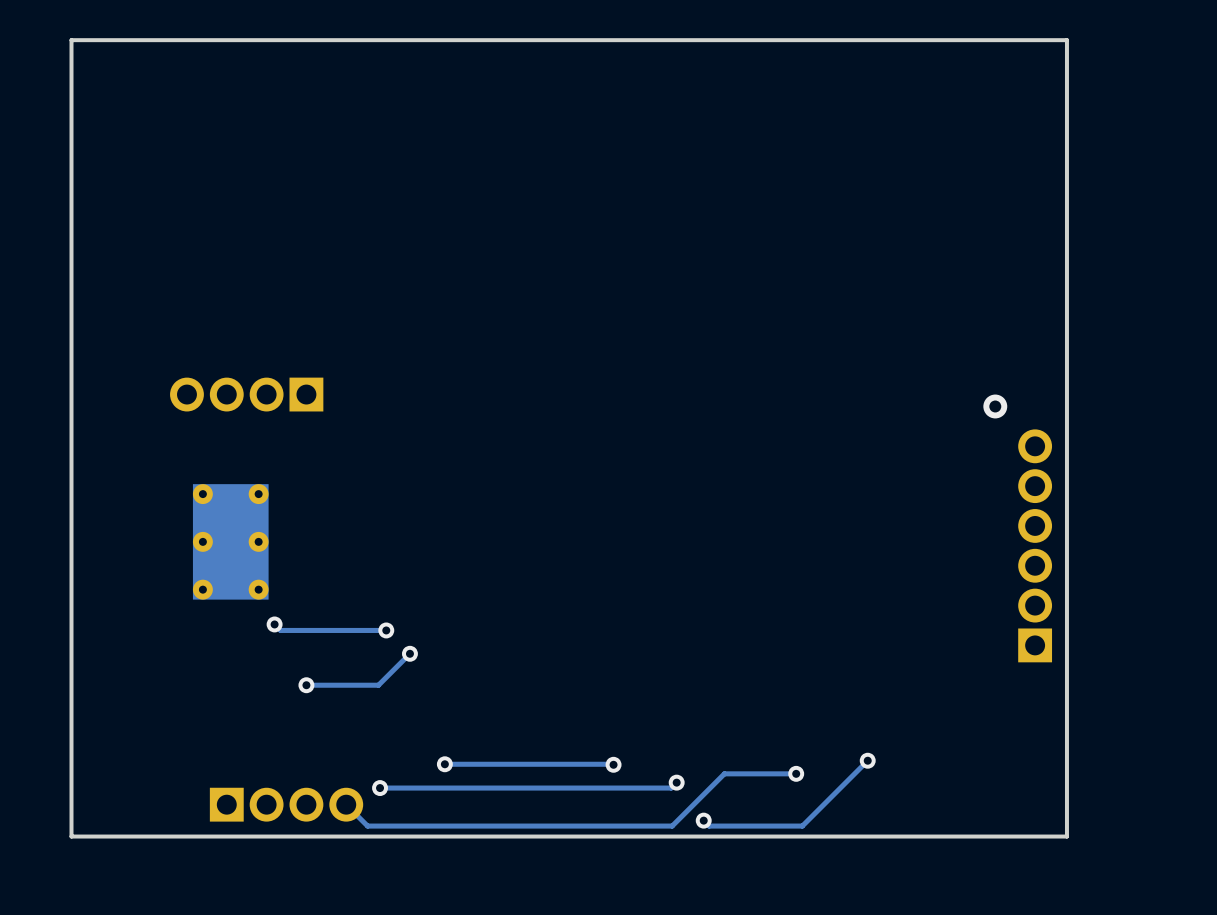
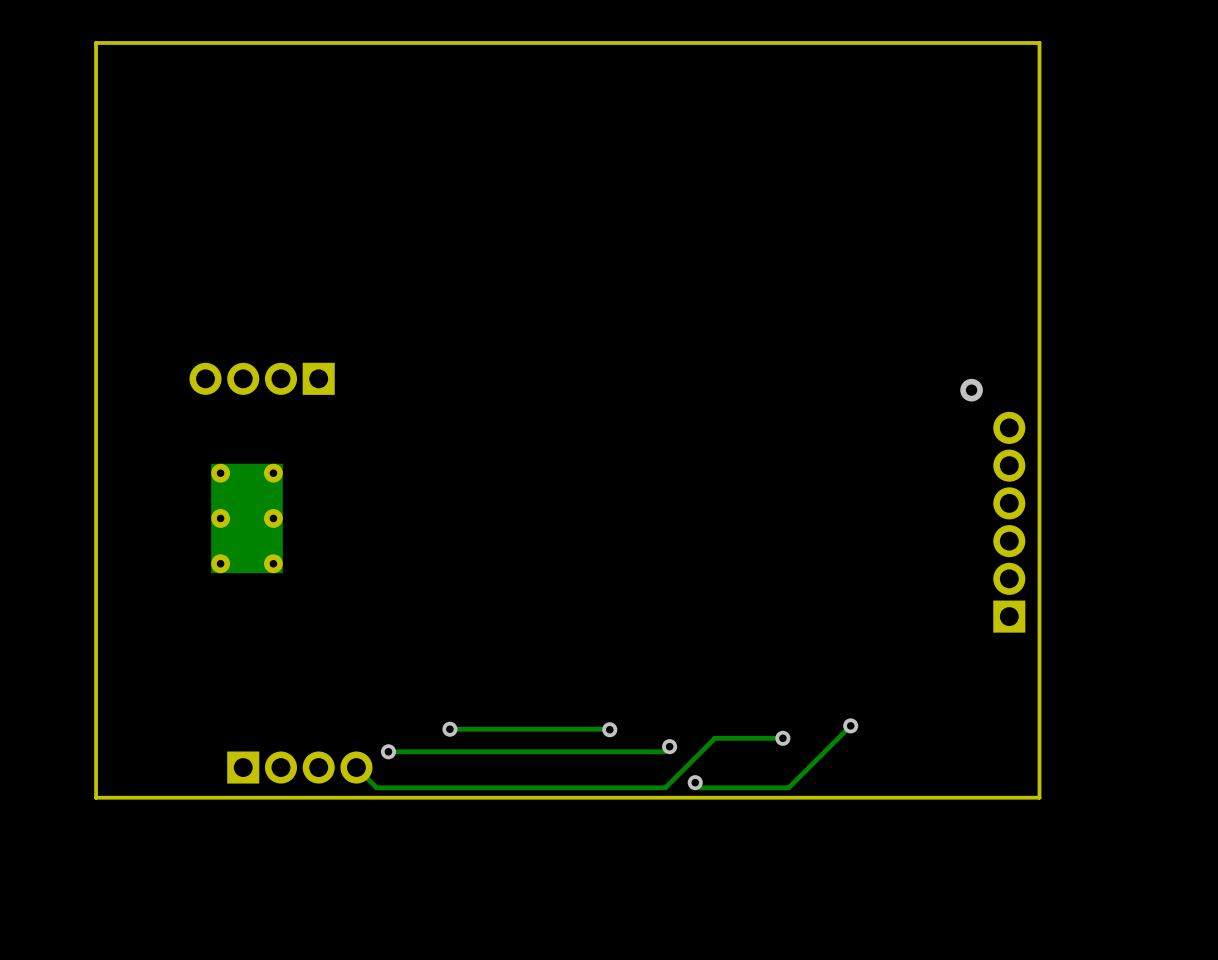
track: (274, 624) (280, 630) (386, 630) -> none
via: (274, 624) -> none
via: (386, 630) -> none
track: (409, 653) (378, 685) (306, 685) -> none
via: (409, 653) -> none
via: (306, 685) -> none

